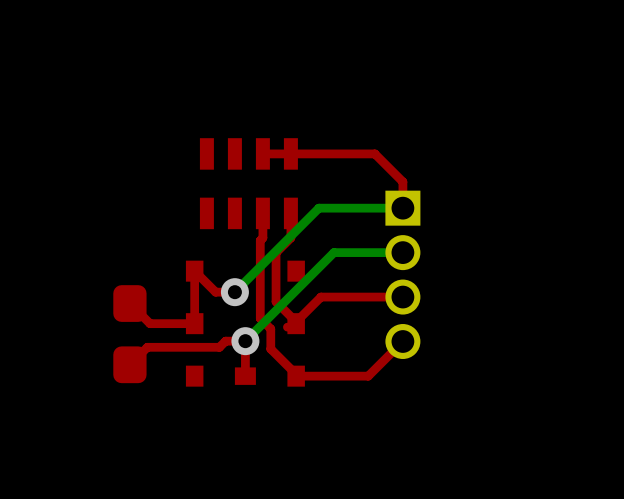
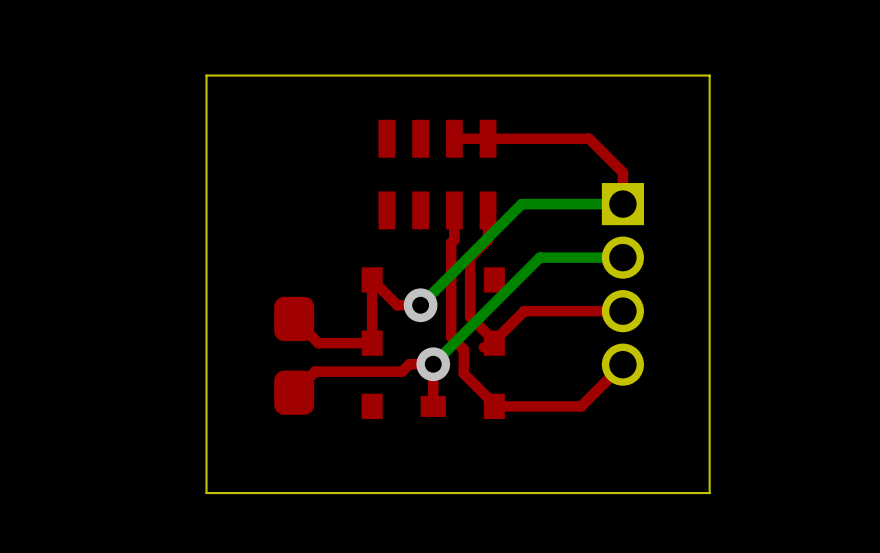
board edge: none -> (709, 75) (206, 75) (206, 493) (709, 493) (709, 75)

